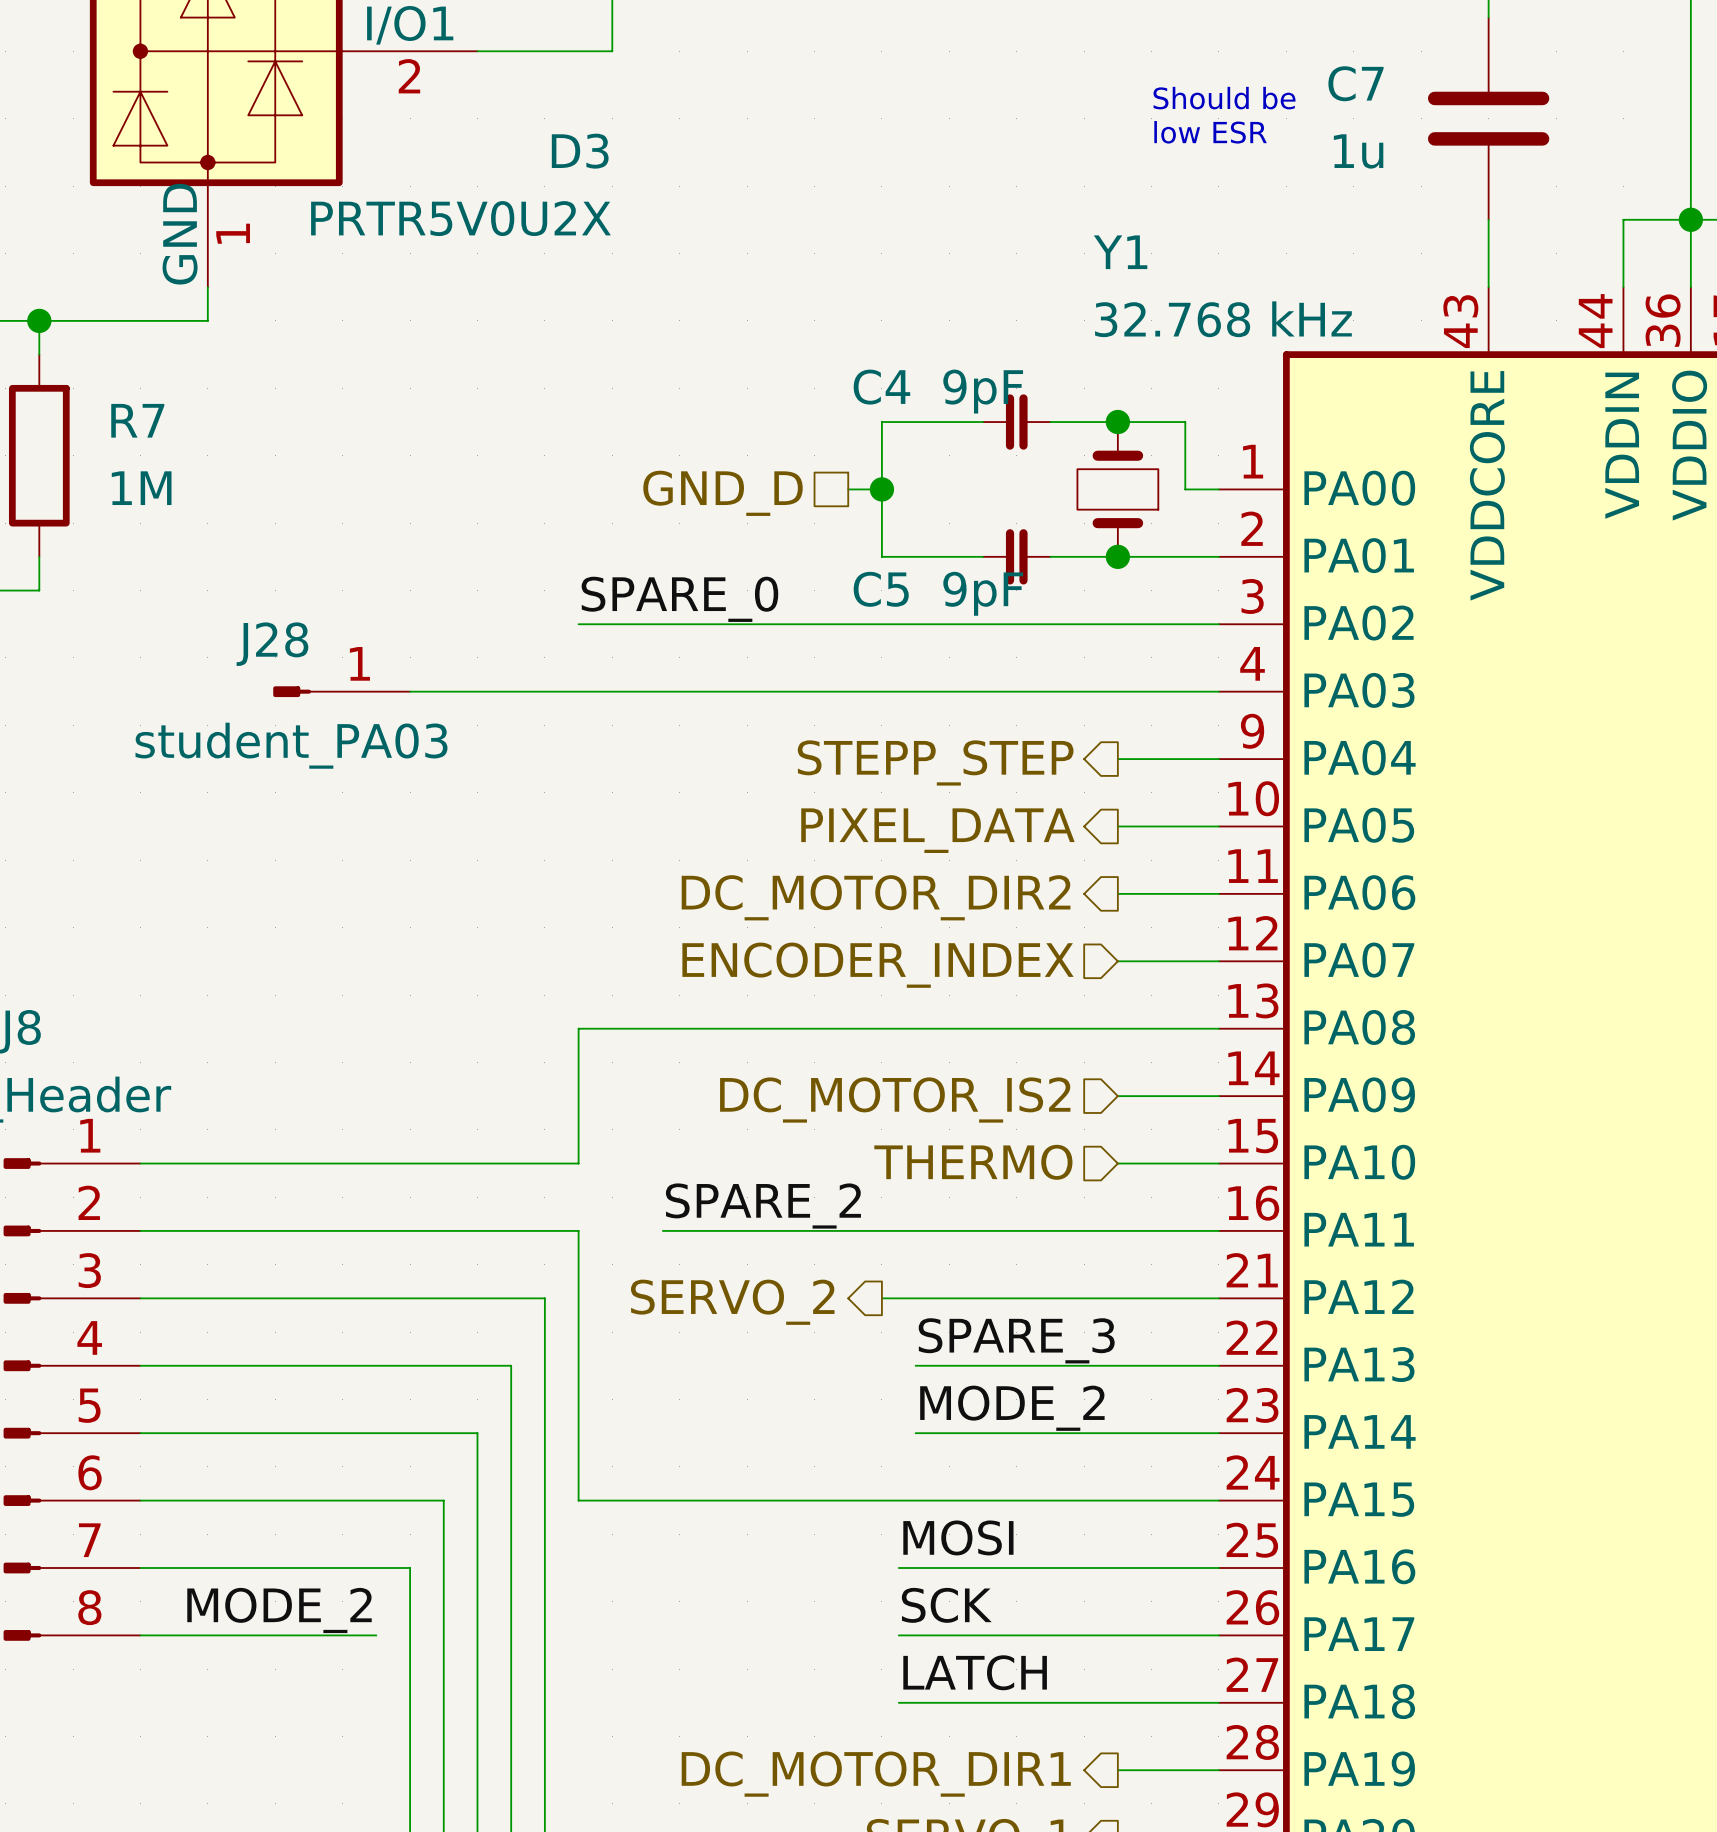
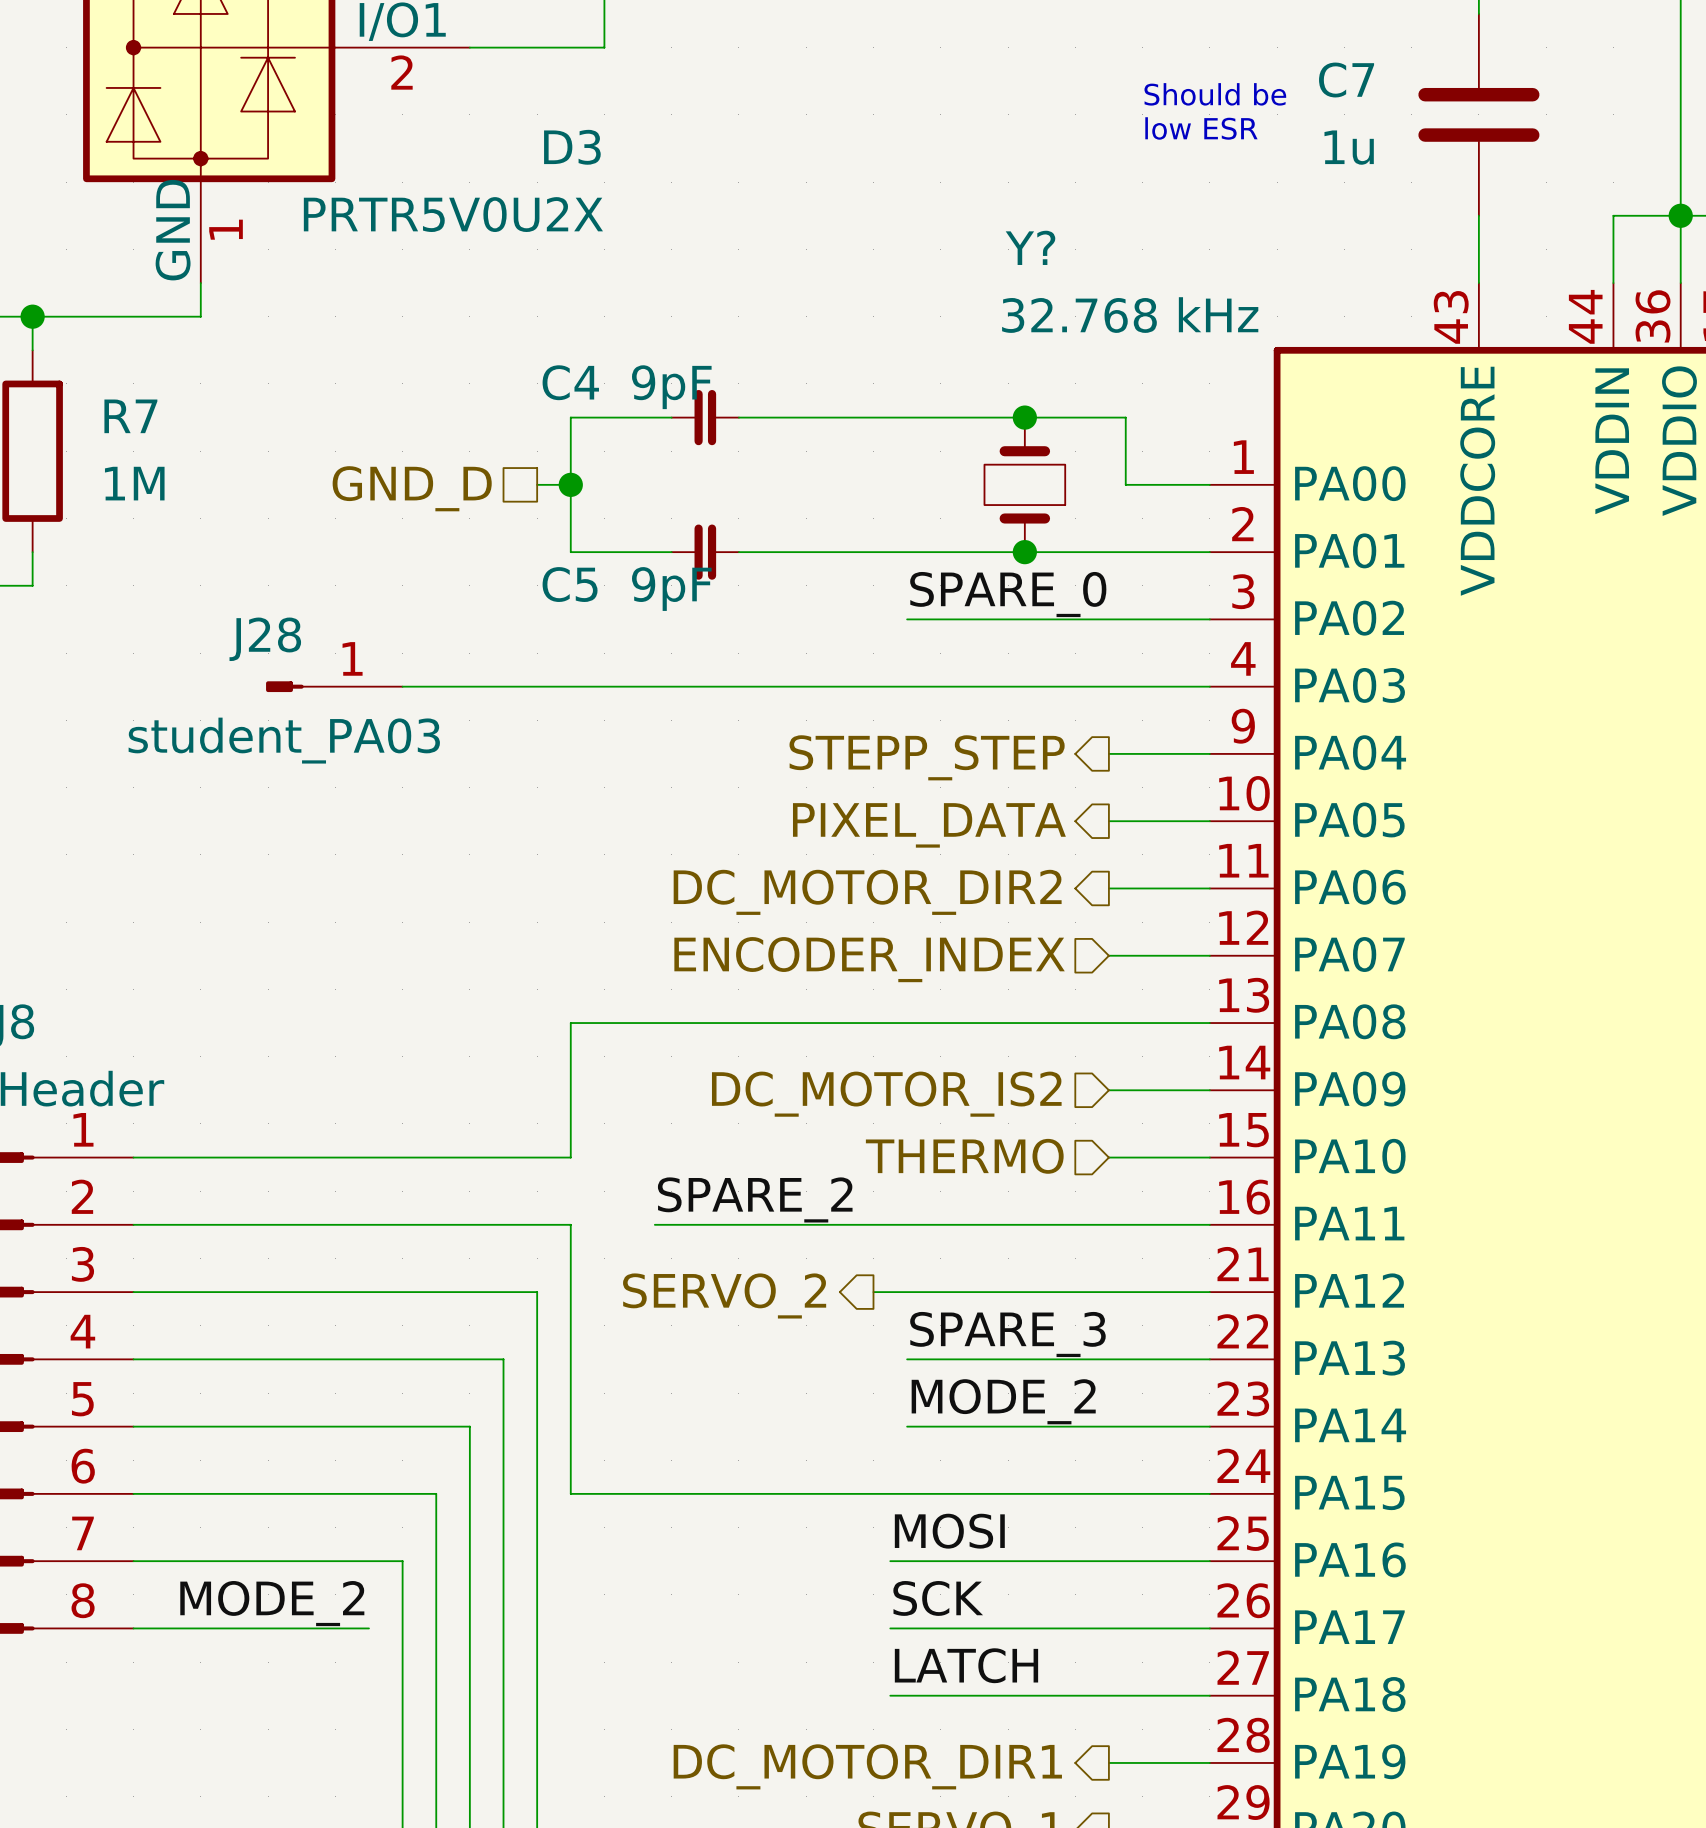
wire: none -> (671, 417) (570, 417) (570, 552) (671, 552)
wire: (881, 422) (881, 556) -> (873, 417) (738, 417)
C4 position: (1016, 422) -> (705, 417)
junction: none -> (1024, 417)
junction: (1117, 422) -> none
wire: (1134, 422) (1185, 422) (1185, 489) -> (1125, 417) (1125, 484) (1176, 484)
junction: none -> (570, 484)
wire: (848, 489) (881, 489) -> (537, 484) (570, 484)
junction: (881, 489) -> none
Y?: none -> 32.768 kHz (1024, 484)
Y1: 32.768 kHz (1117, 489) -> none
hierarchical label position: GND_D (723, 493) -> GND_D (412, 488)
wire: none -> (738, 552) (873, 552)
C5 position: (1016, 556) -> (705, 552)
junction: none -> (1024, 552)
junction: (1117, 556) -> none
label position: SPARE_0 (679, 599) -> SPARE_0 (1008, 594)
wire: (578, 624) (915, 624) -> none

